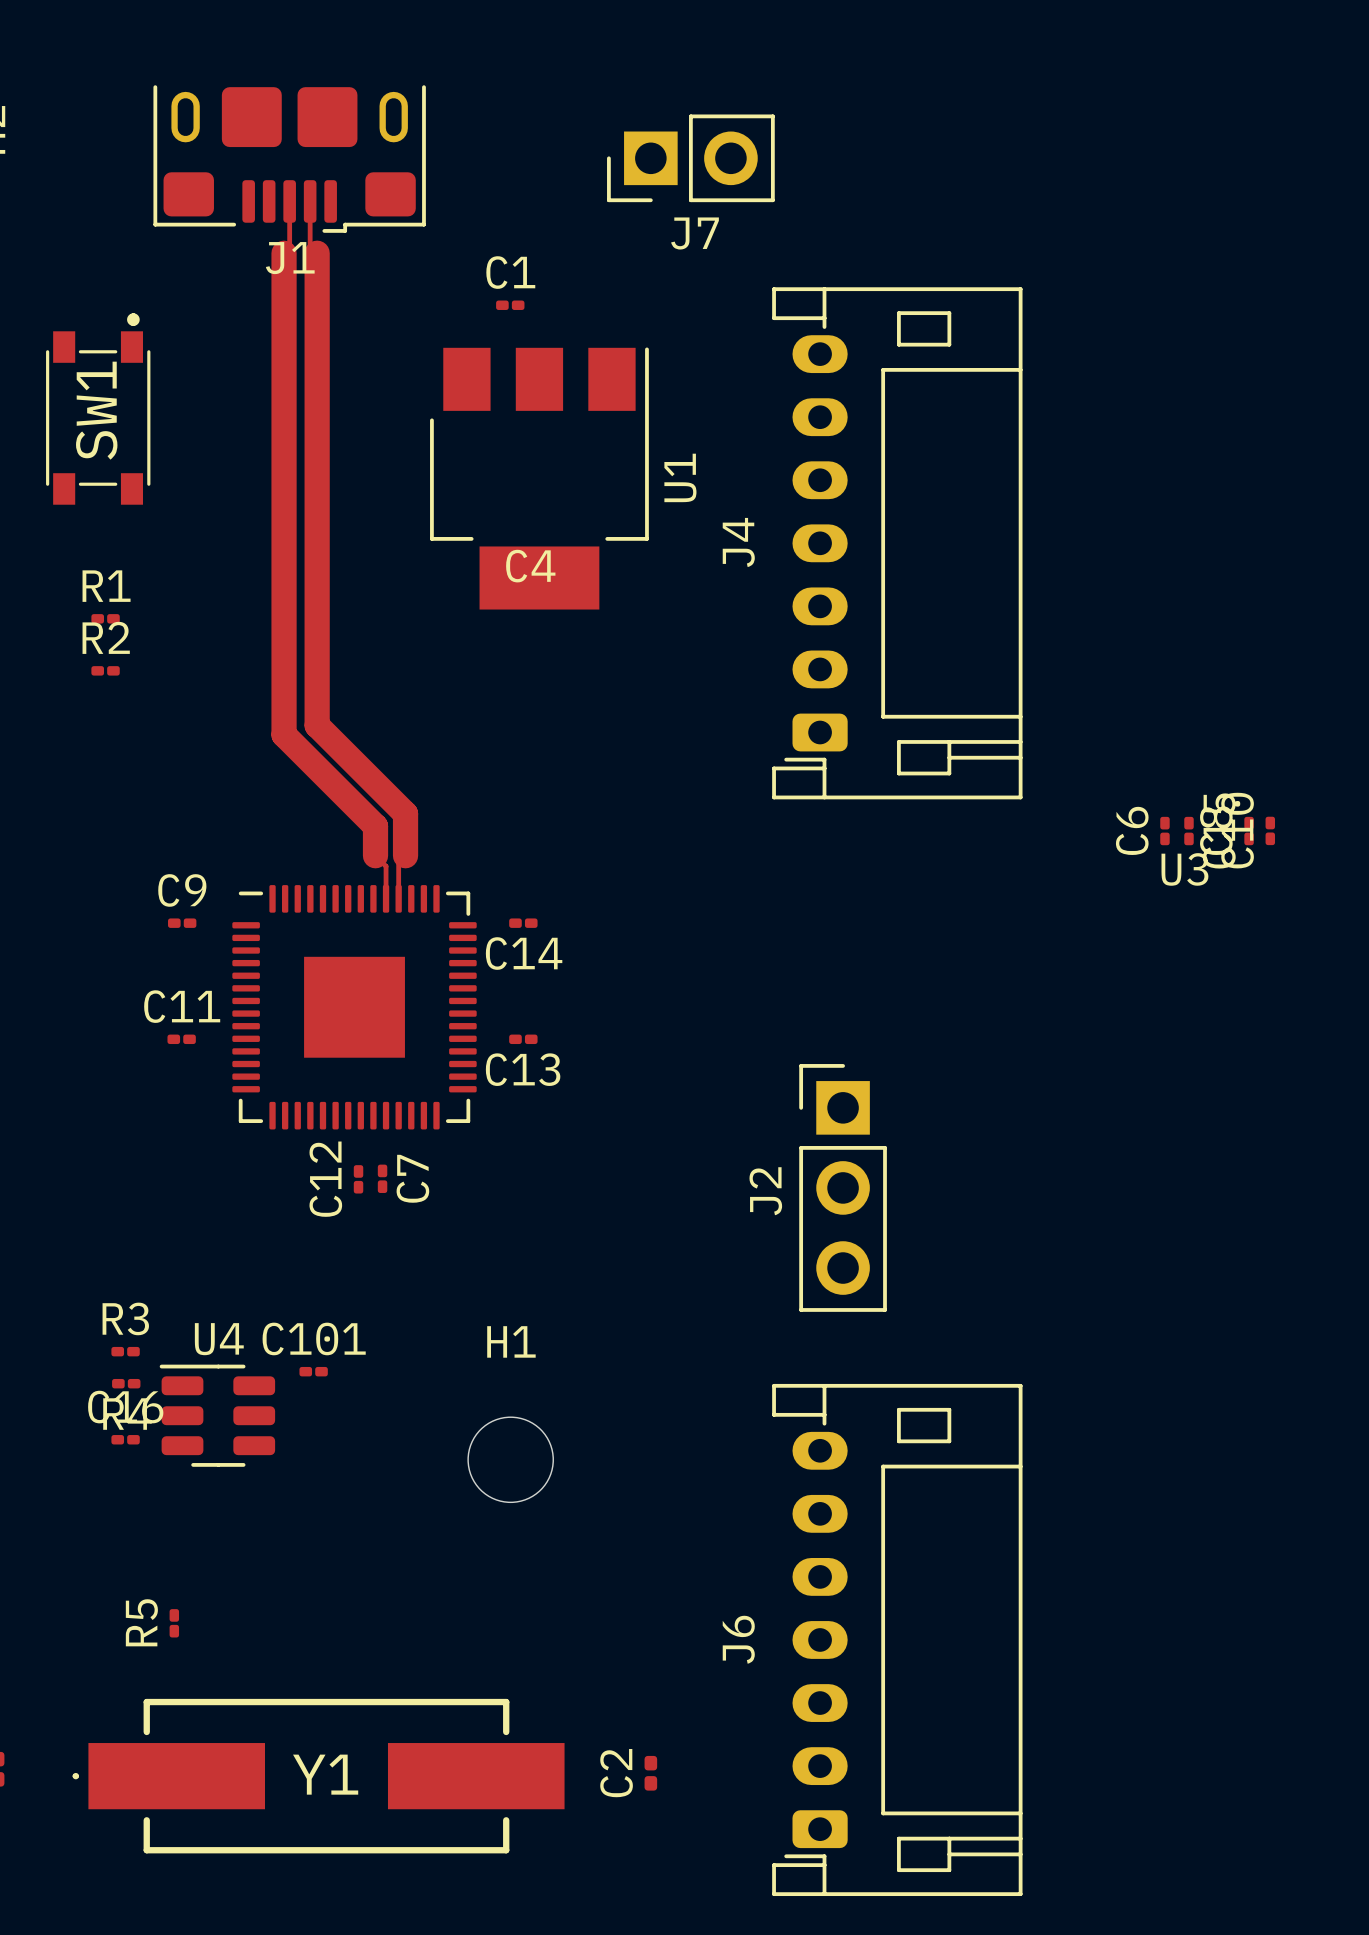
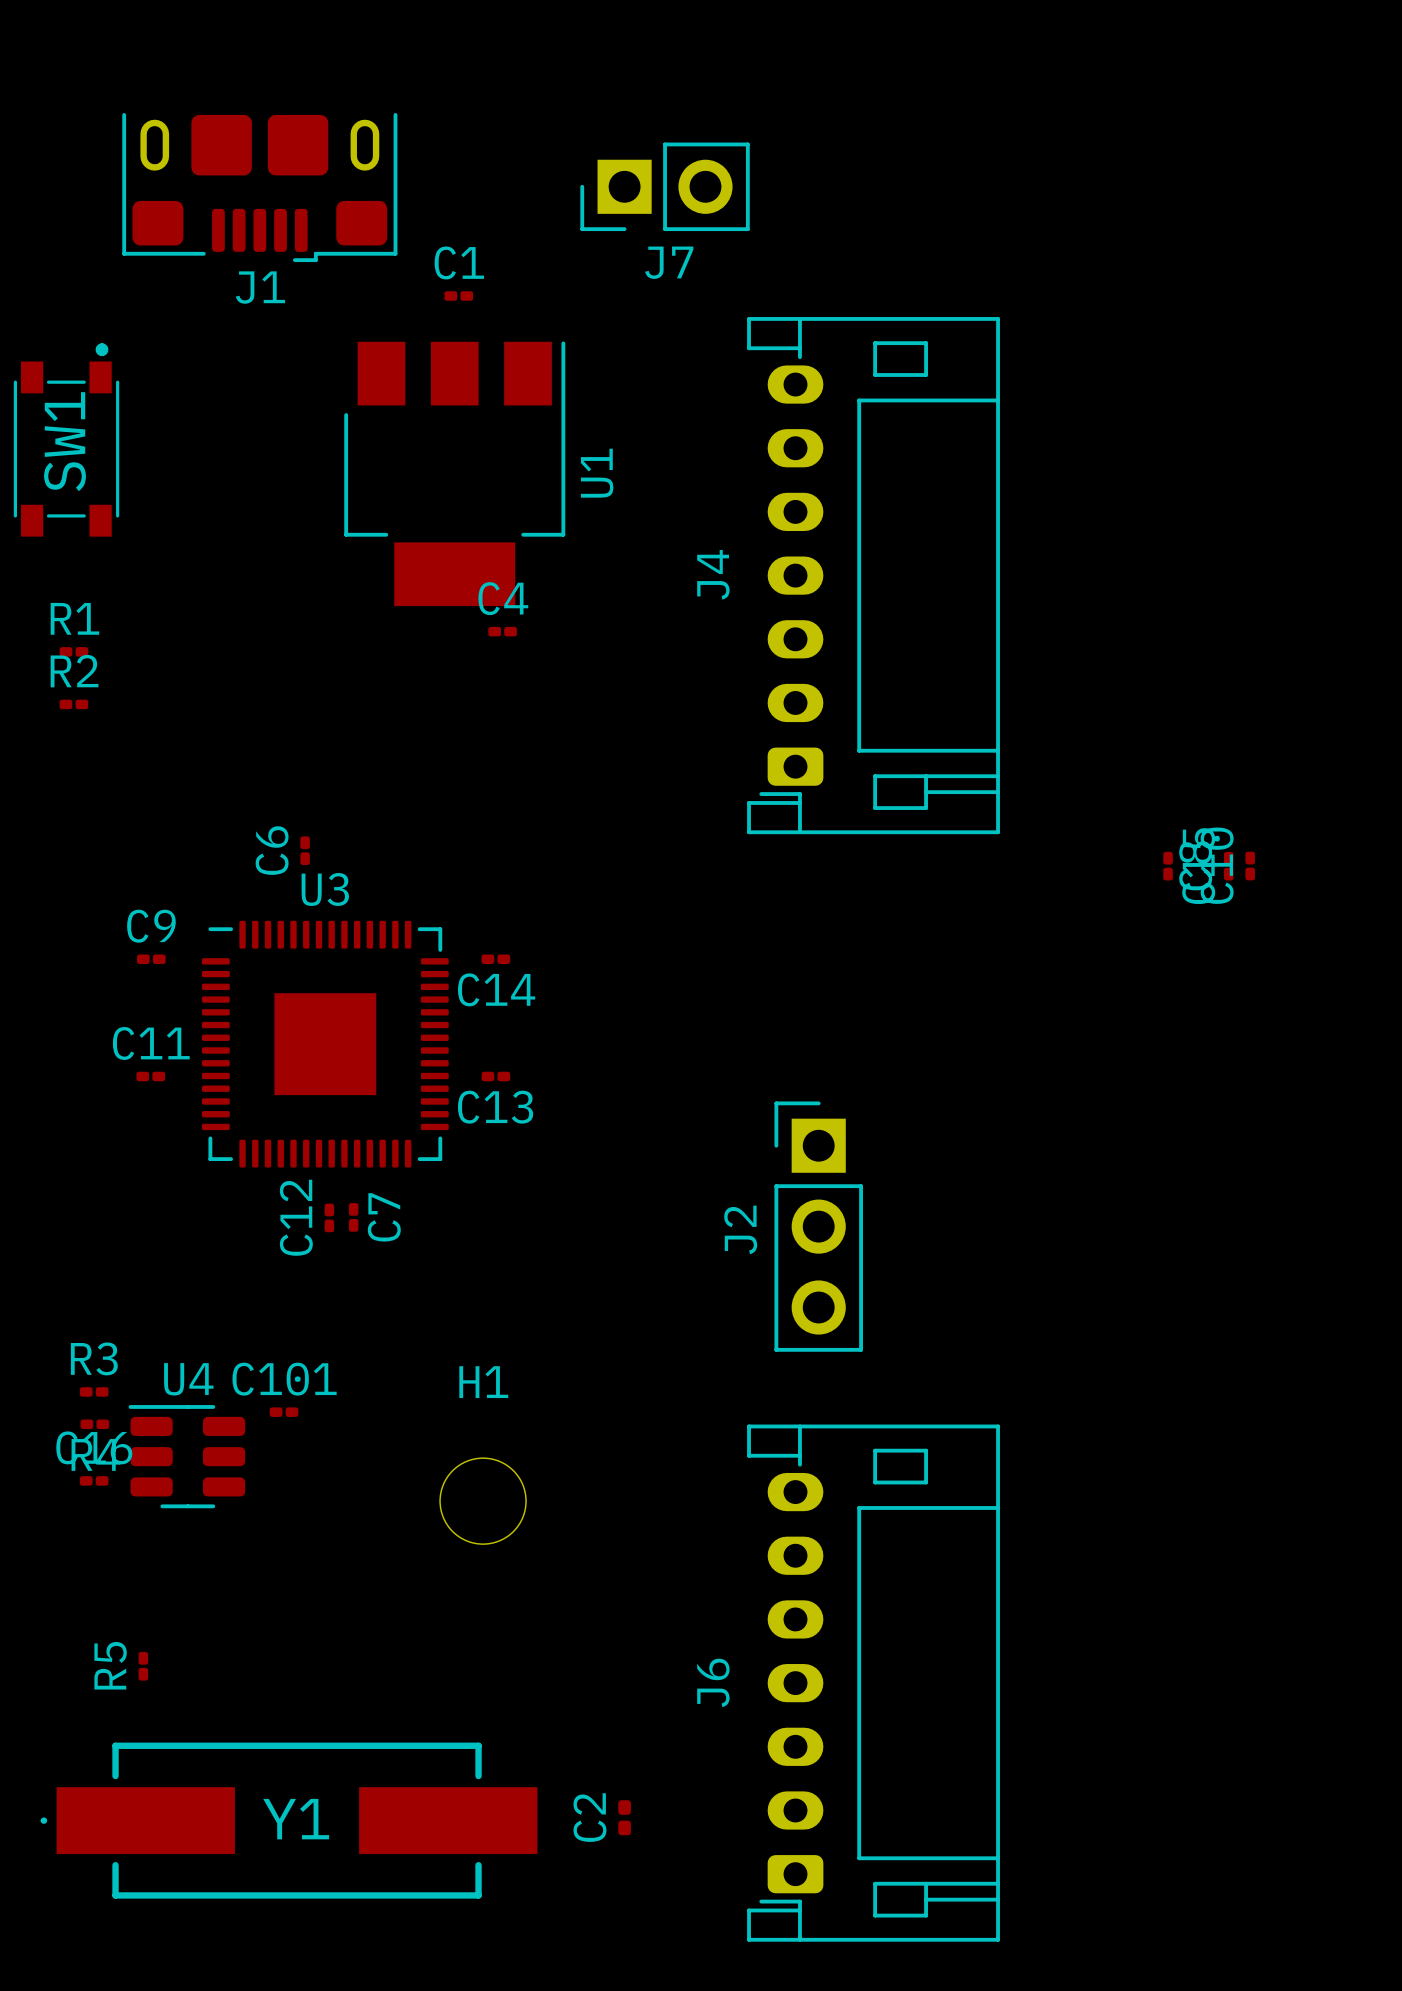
track: (289, 201) (289, 247) (284, 253) (284, 734) (375, 826) (375, 855) (386, 866) (386, 898) -> none
track: (310, 201) (310, 246) (317, 253) (317, 725) (405, 813) (405, 855) (398, 862) (398, 898) -> none
C1 position: (510, 305) -> (458, 295)
U1 position: (539, 478) -> (454, 473)
C6 position: (1164, 831) -> (305, 850)
U3 name position: U3 (1184, 869) -> U3 (325, 889)

